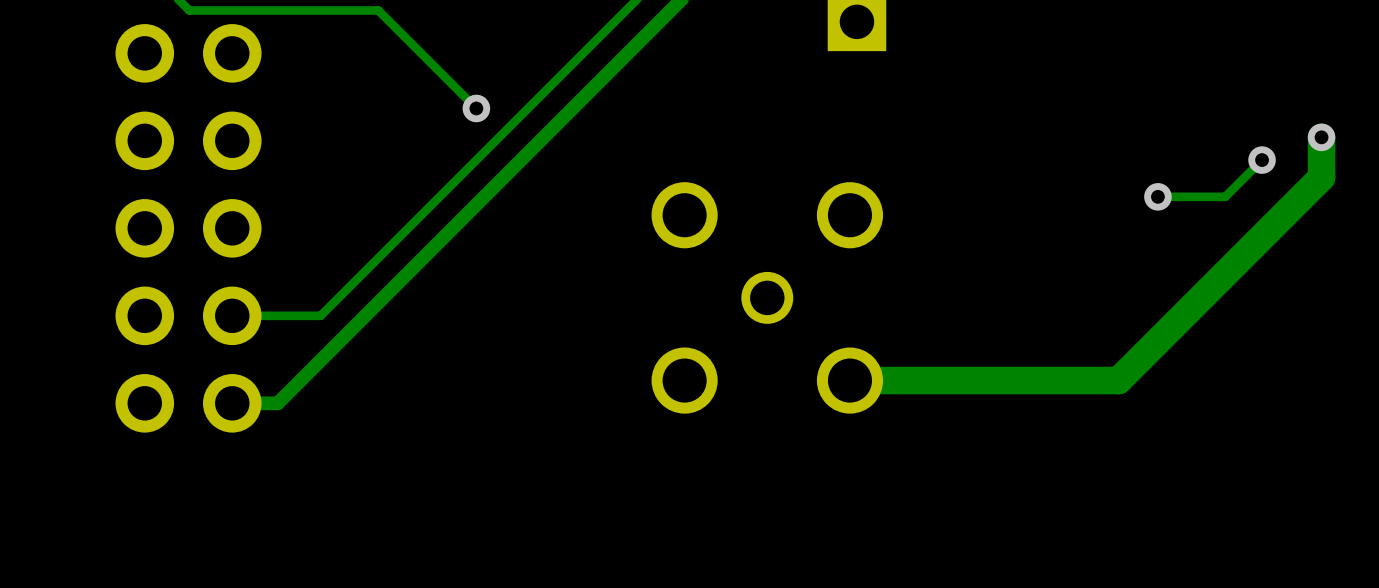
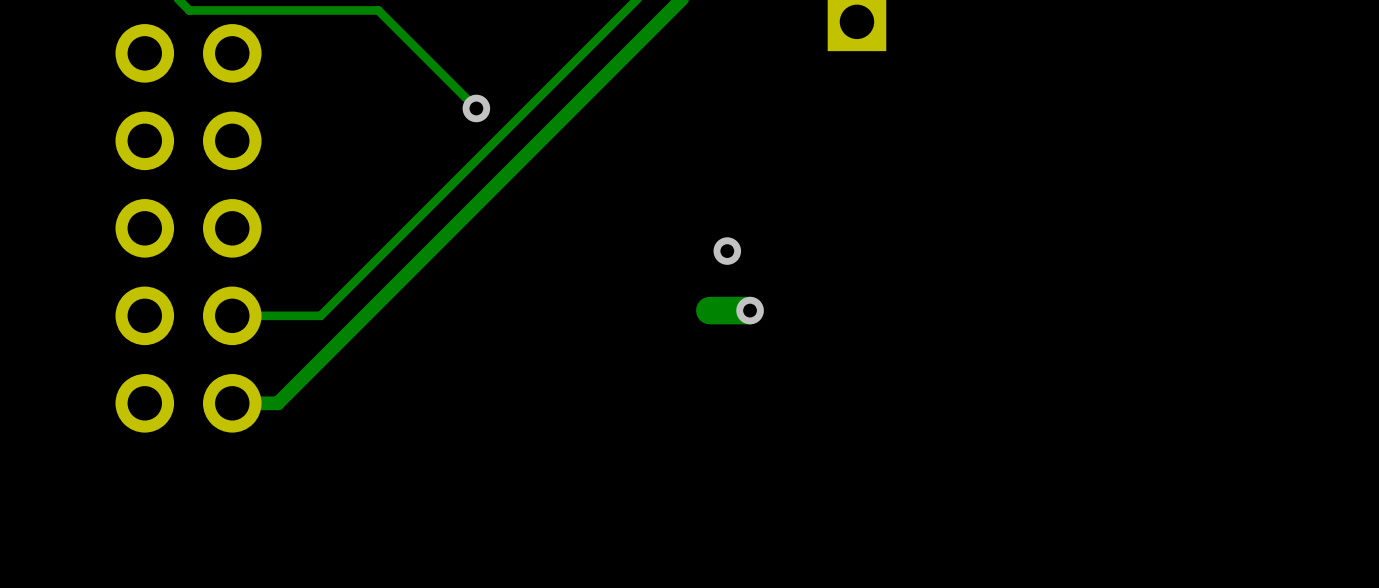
track: (1321, 137) (1321, 177) (1118, 380) (849, 380) -> none
via: (1321, 137) -> none
track: (1262, 160) (1225, 196) (1157, 196) -> none
via: (1262, 160) -> none
via: (1157, 196) -> none
via: none -> (727, 251)
part: (767, 297) -> none
track: none -> (750, 310) (709, 310)
via: none -> (750, 310)

